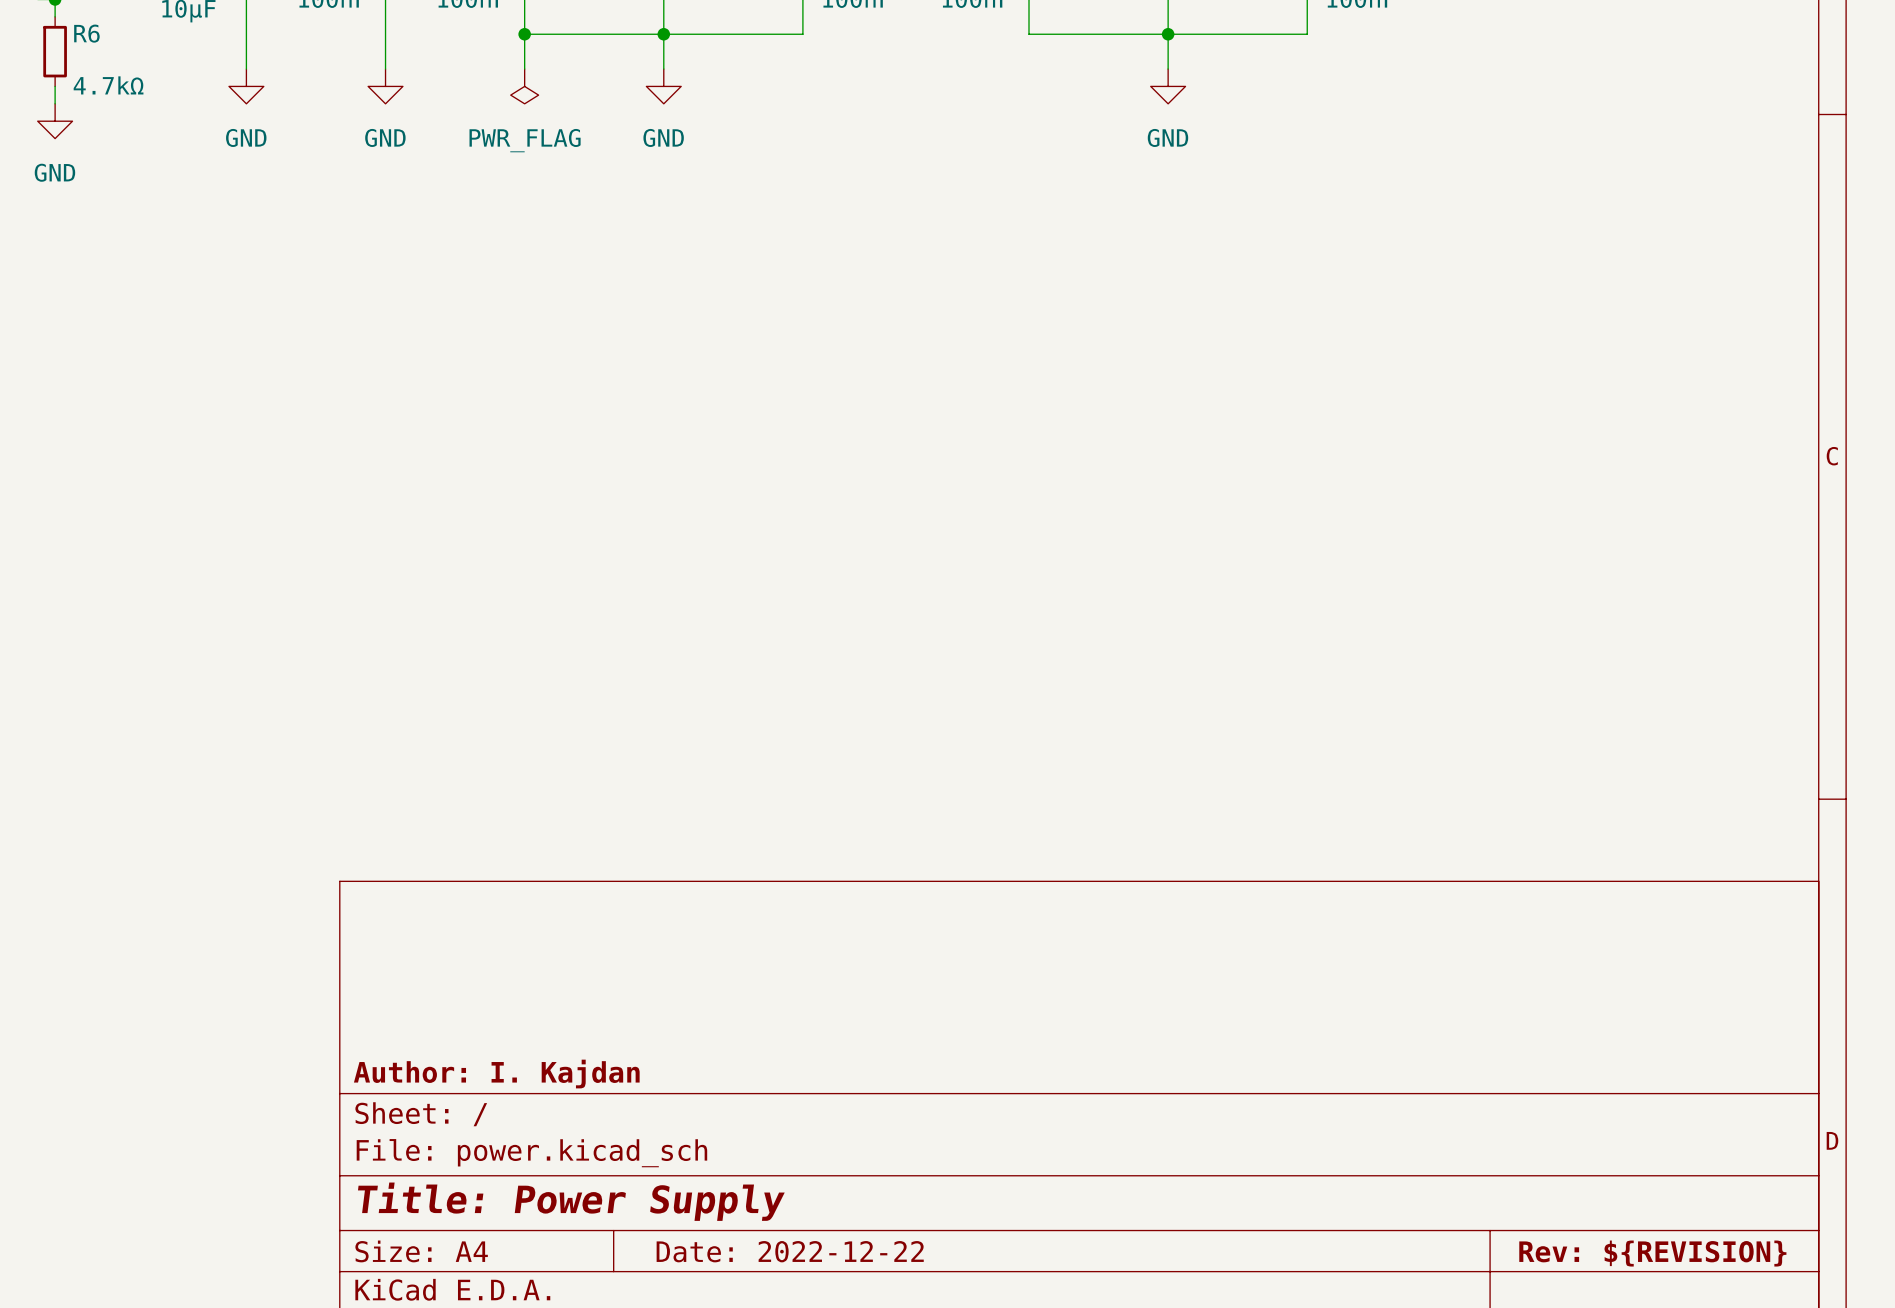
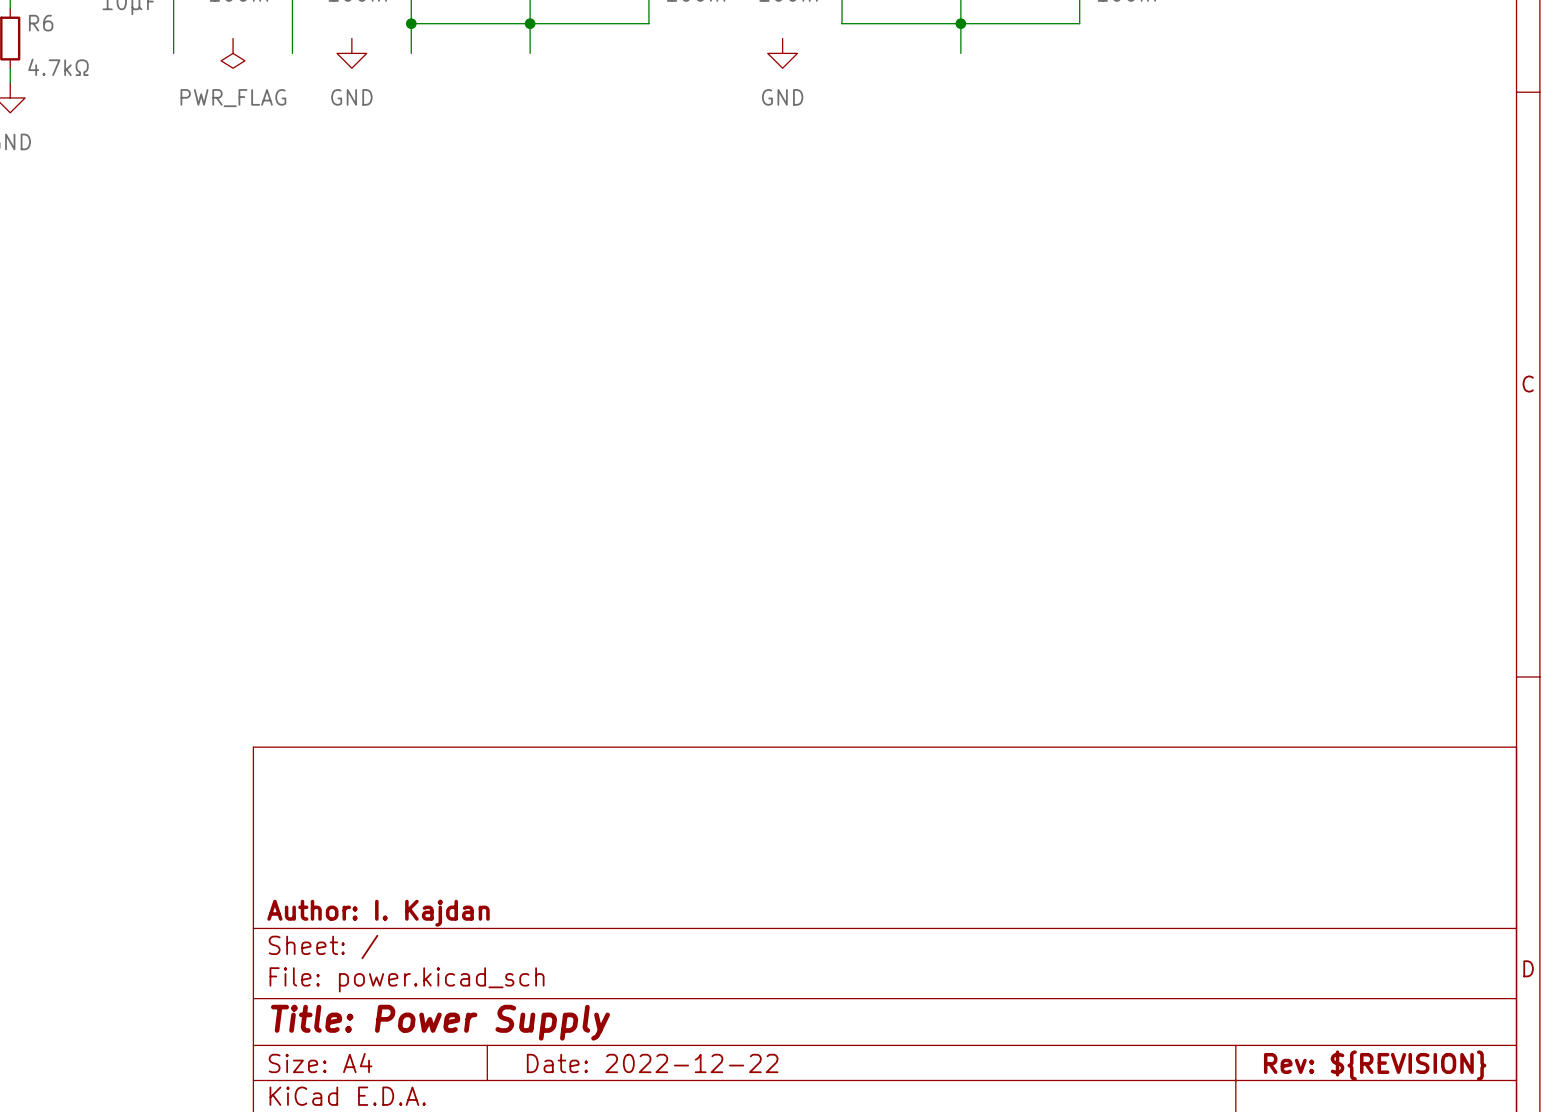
power symbol: none -> PWR_FLAG (233, 53)
power symbol: none -> GND (782, 53)
power symbol: GND (246, 86) -> none
power symbol position: GND (385, 86) -> GND (351, 53)
power symbol: PWR_FLAG (524, 86) -> none
power symbol: GND (663, 86) -> none
power symbol: GND (1168, 86) -> none

